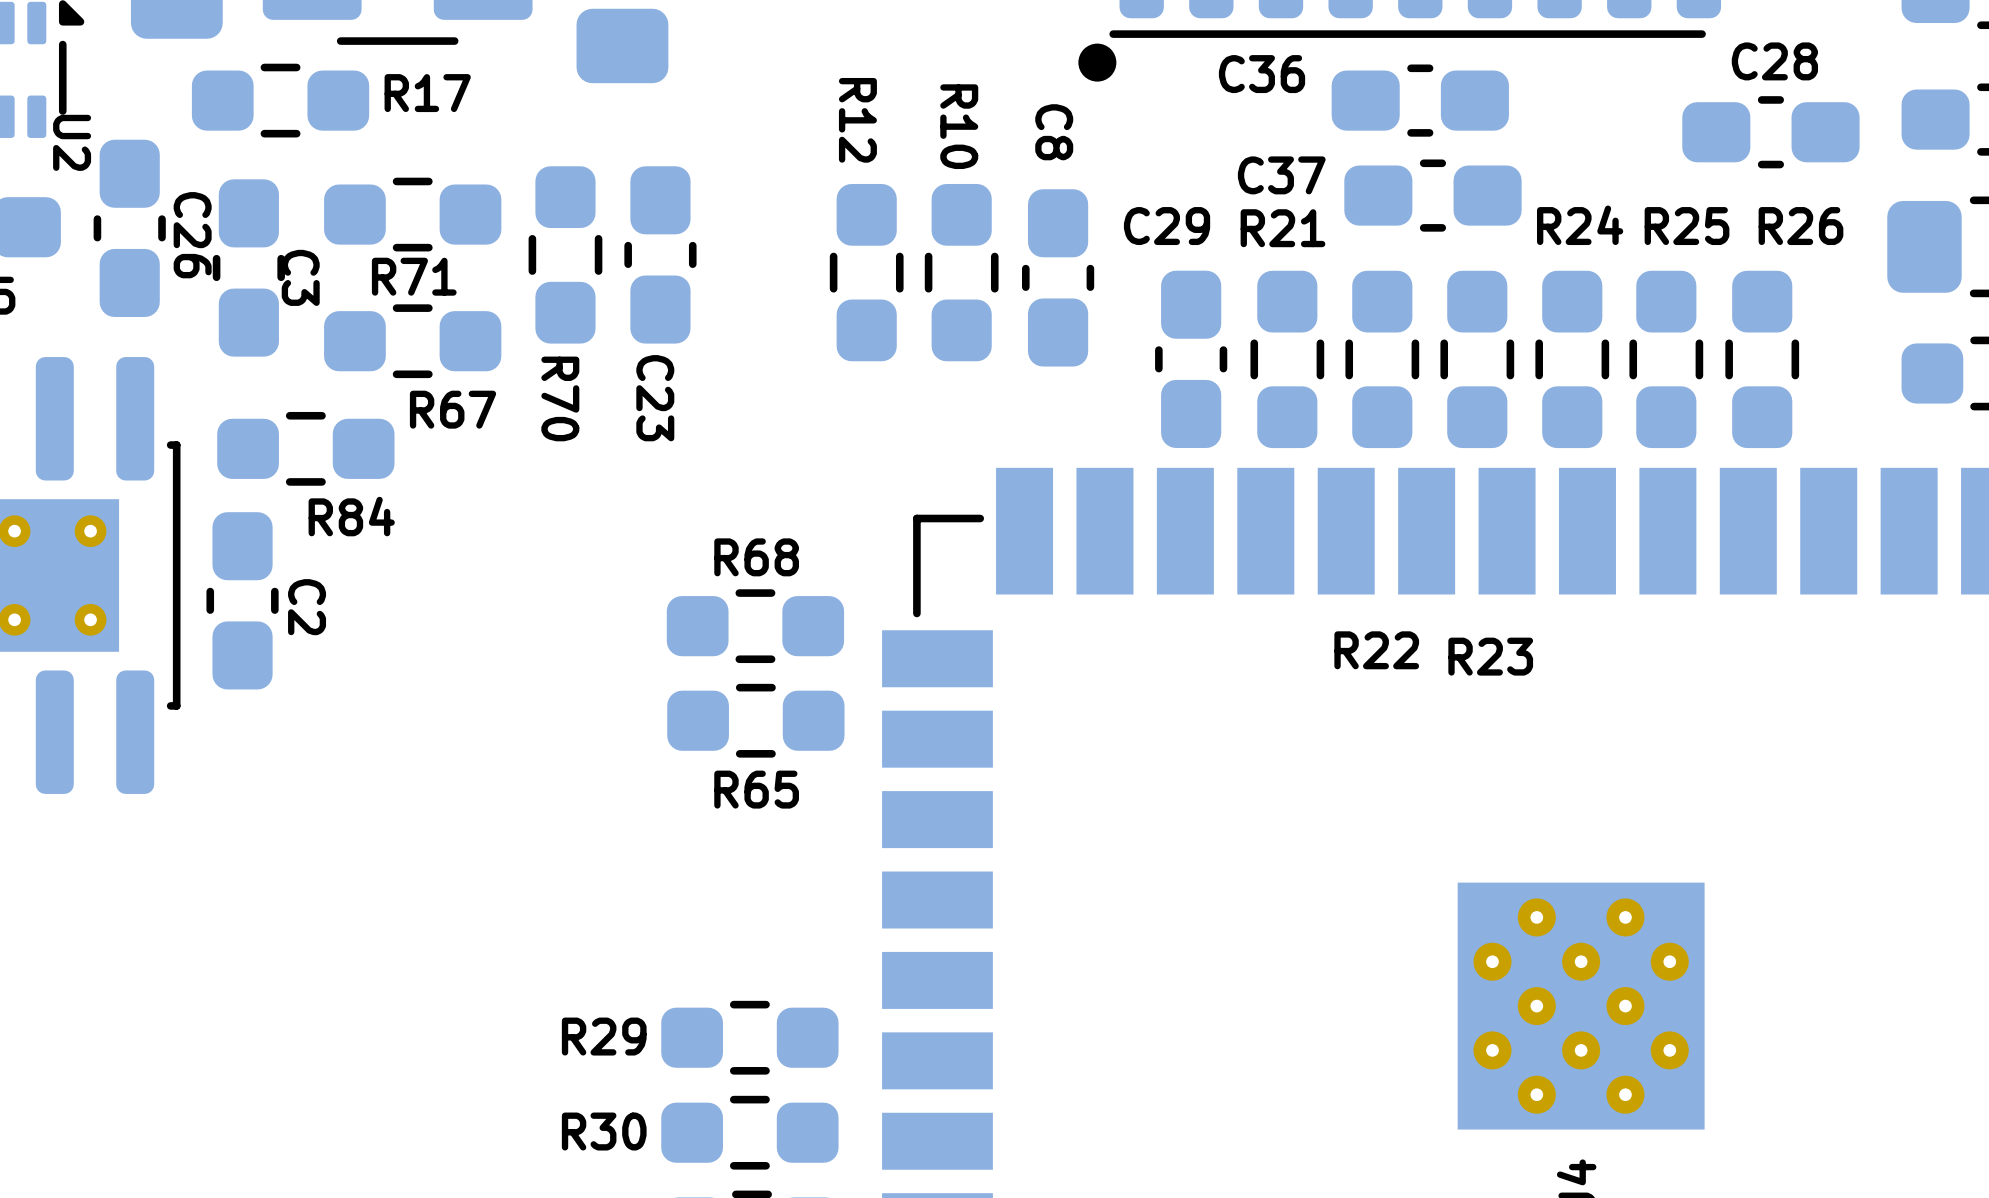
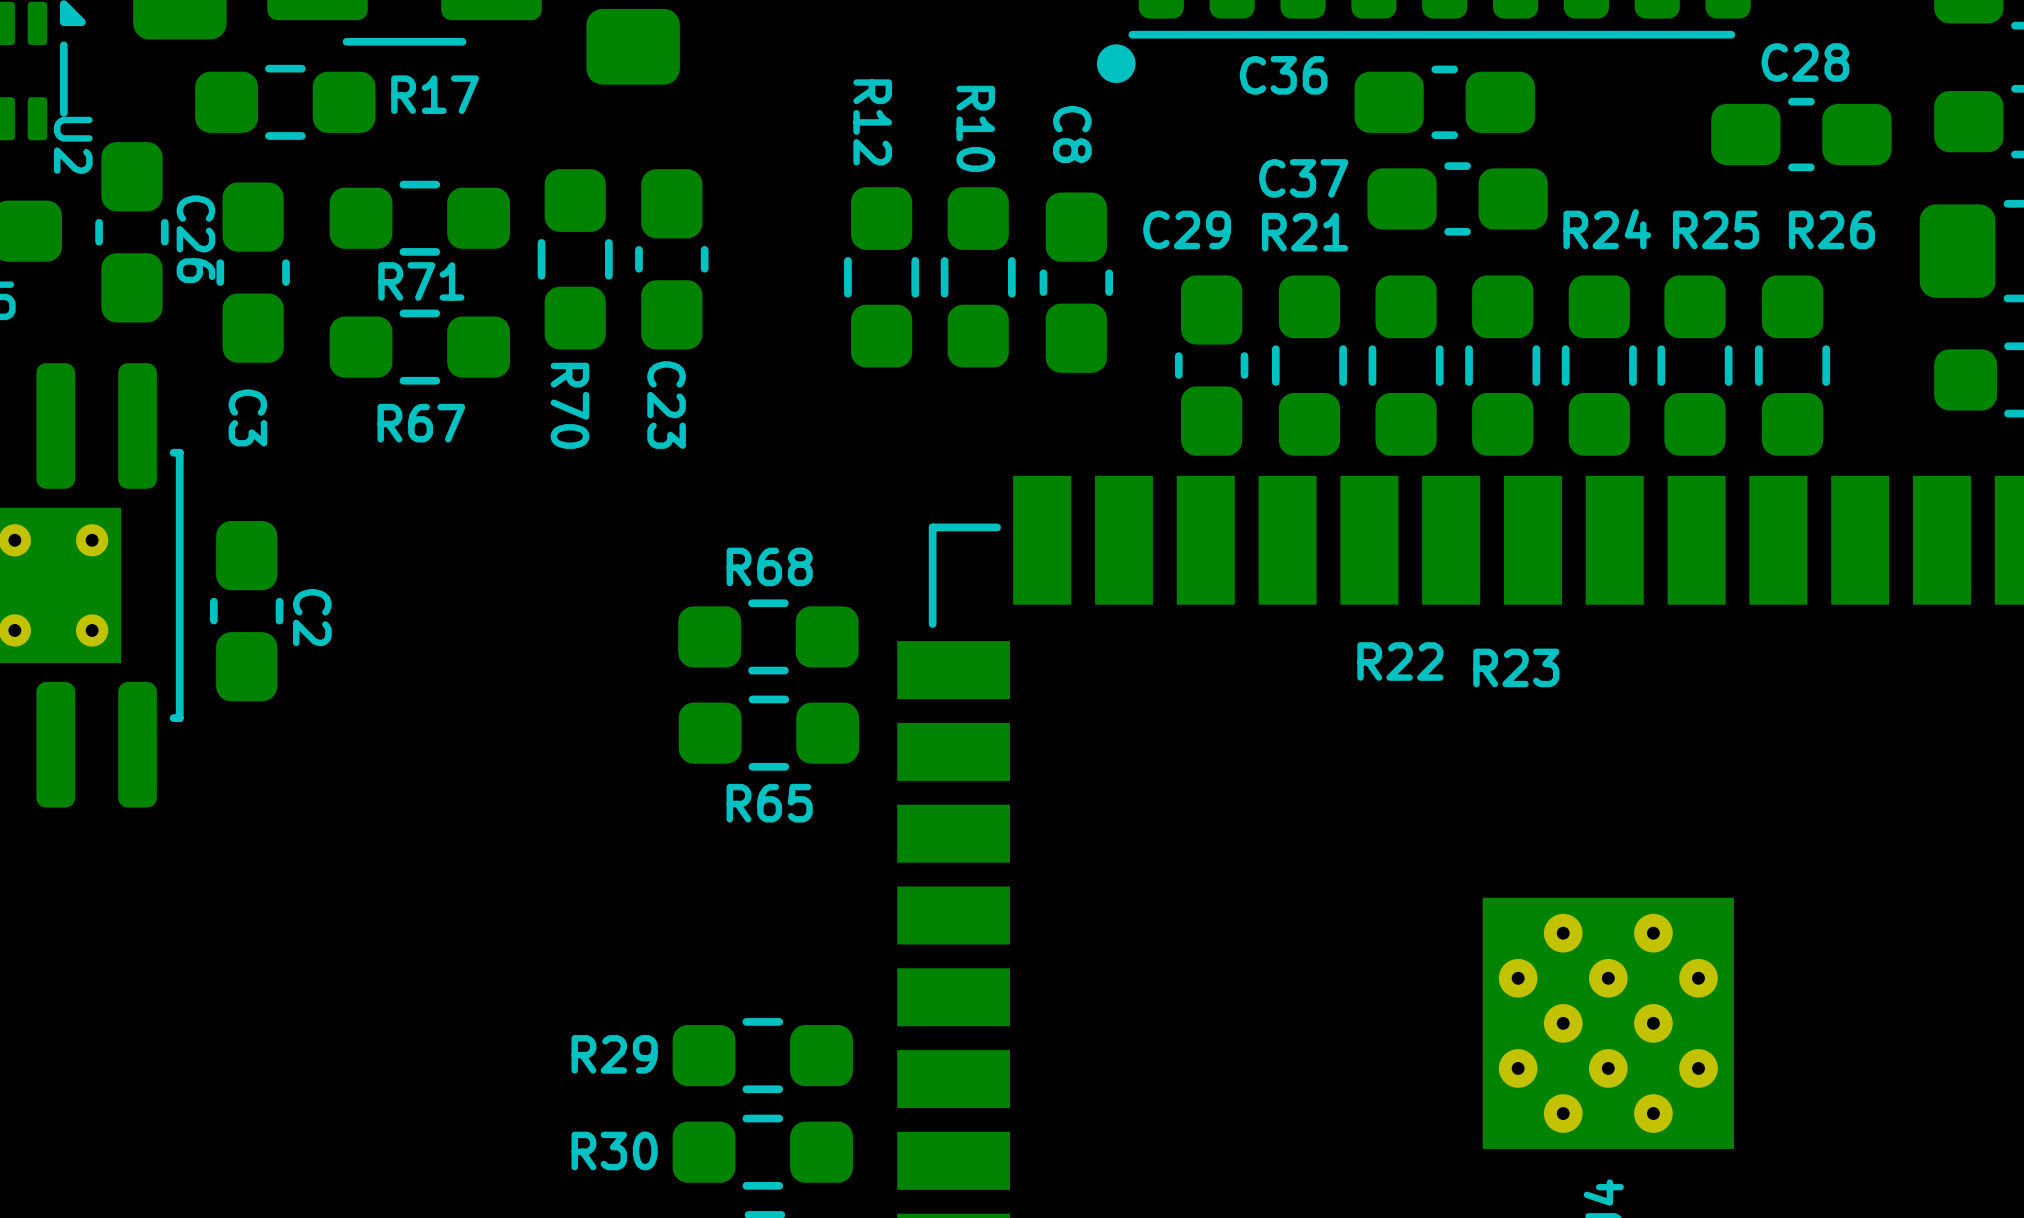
C3 name position: C3 (300, 277) -> C3 (247, 417)
R67 name position: R67 (453, 409) -> R67 (421, 423)
R84: (305, 448) -> none

